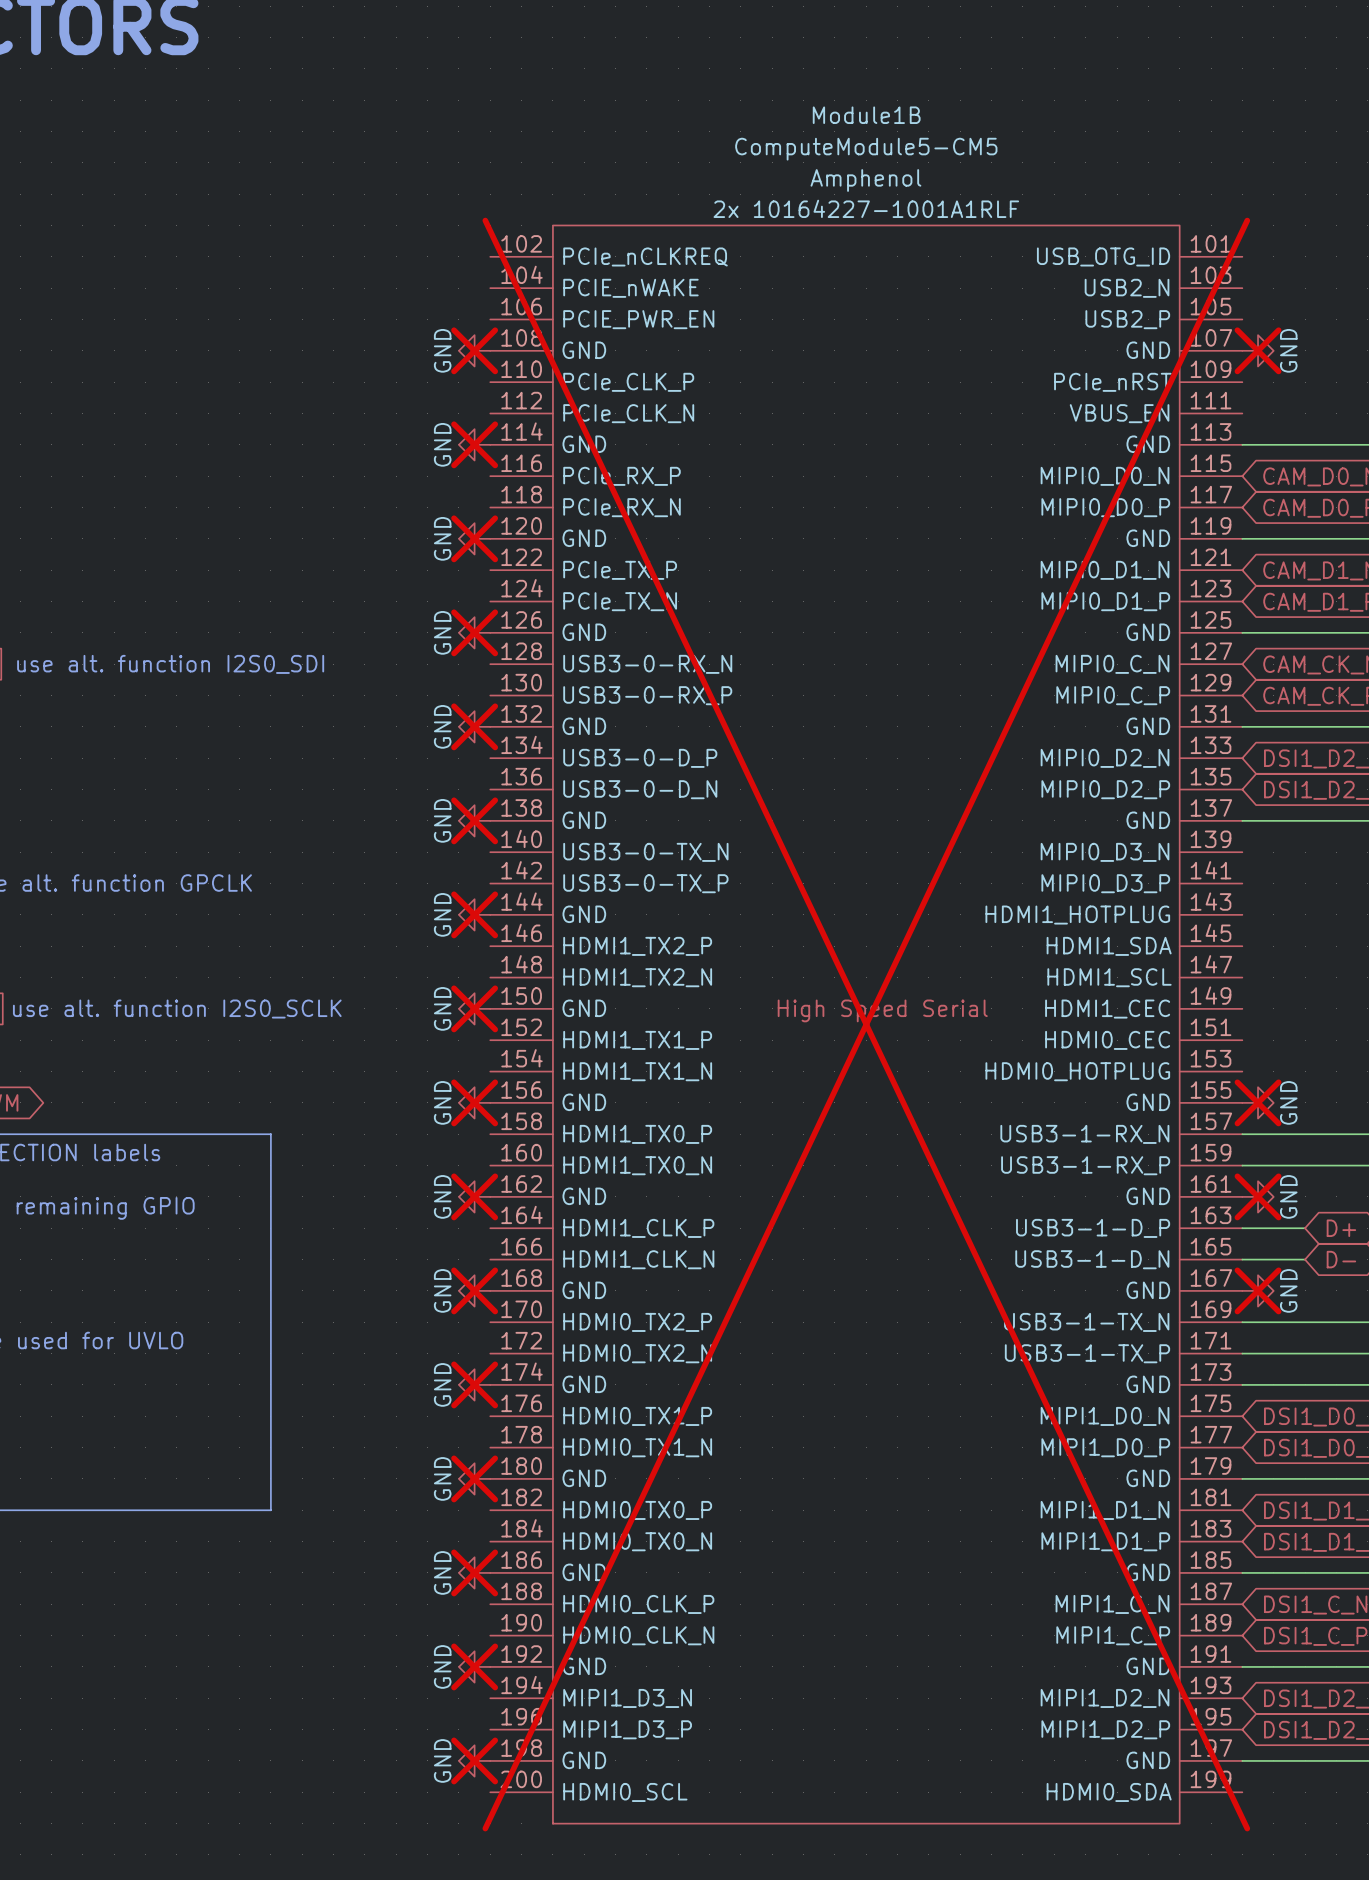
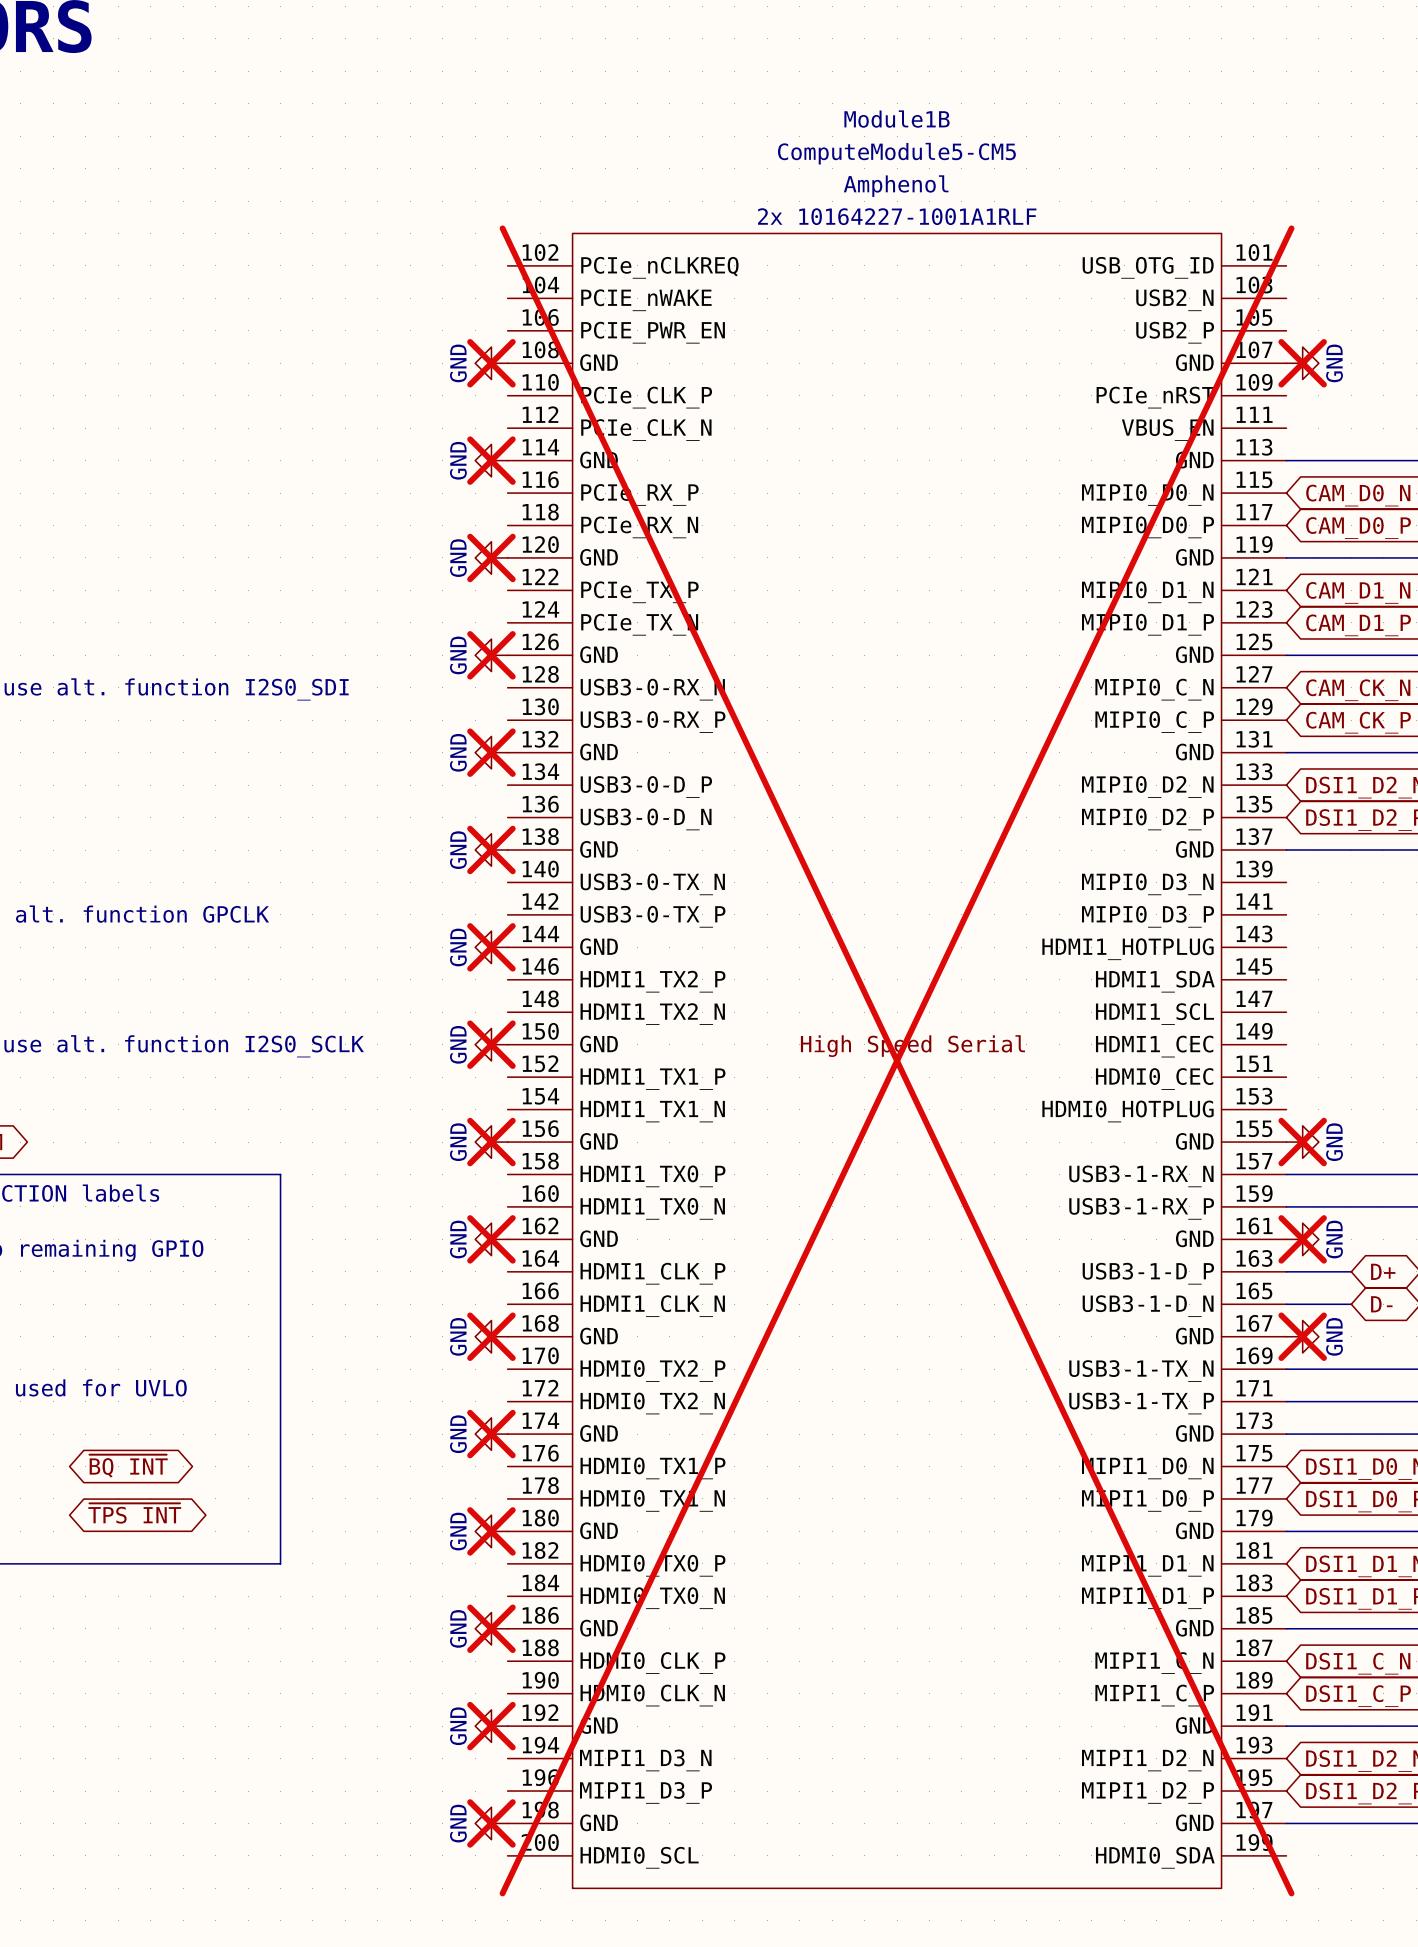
global label: none -> ~{BQ INT} (128, 1466)
global label: none -> ~{TPS INT} (134, 1513)

